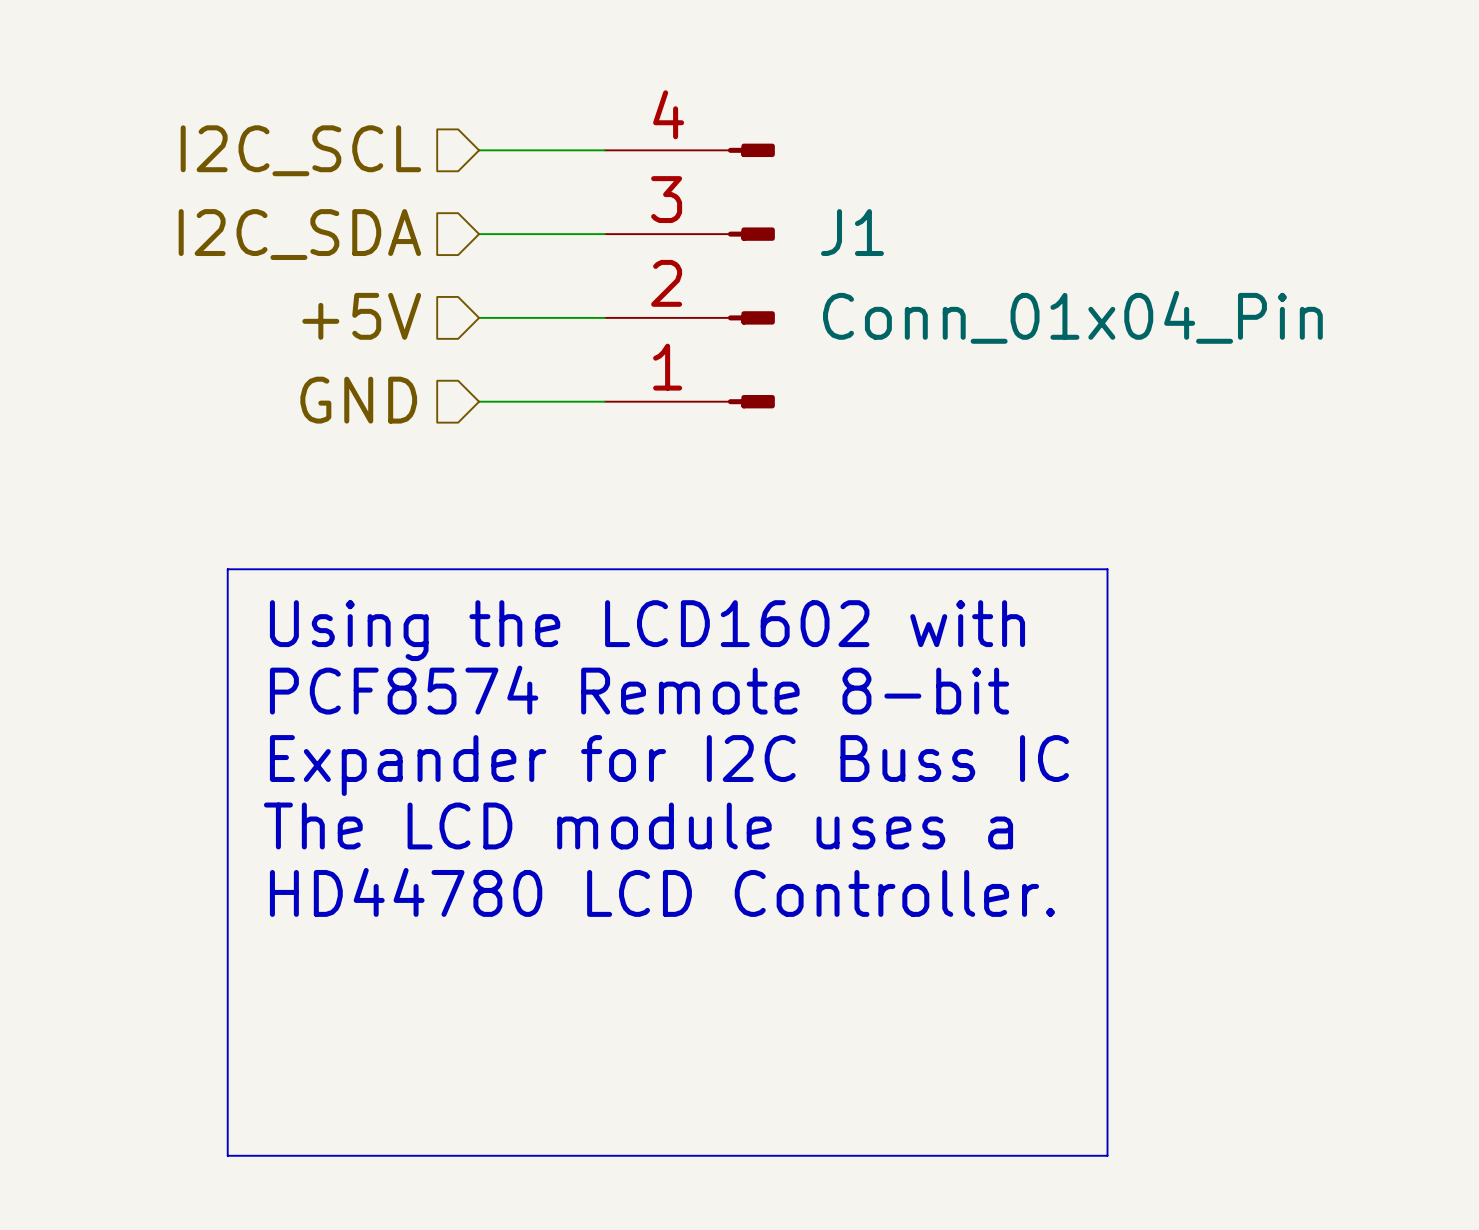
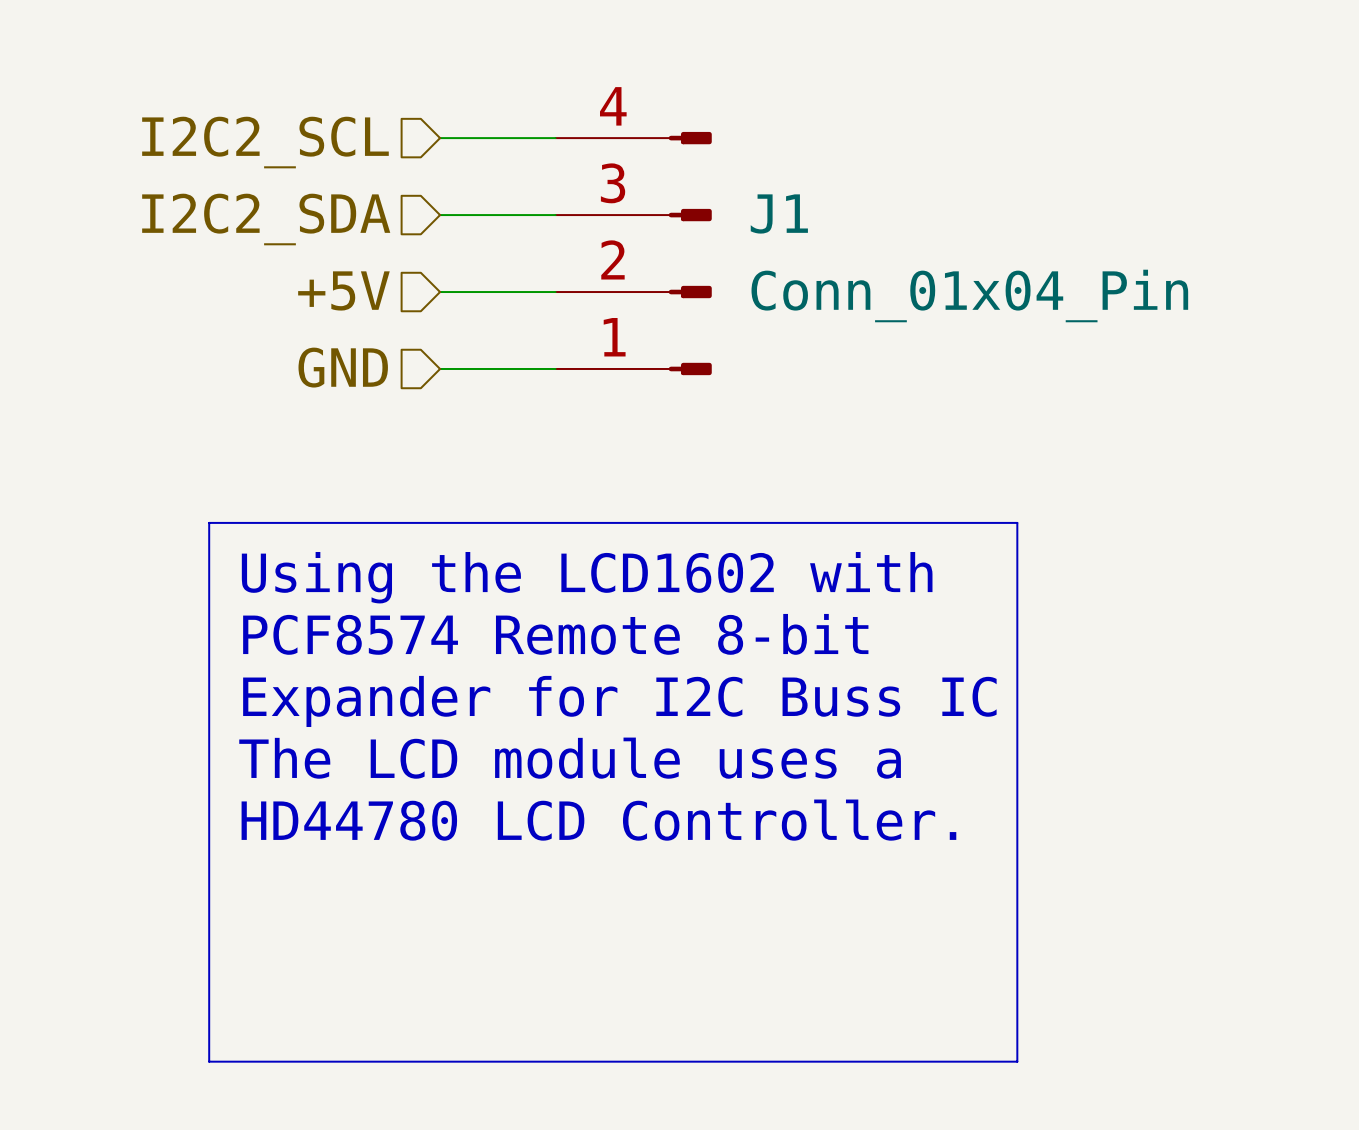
hierarchical label: I2C_SCL (300, 150) -> I2C2_SCL (265, 142)
hierarchical label: I2C_SDA (299, 234) -> I2C2_SDA (266, 219)

